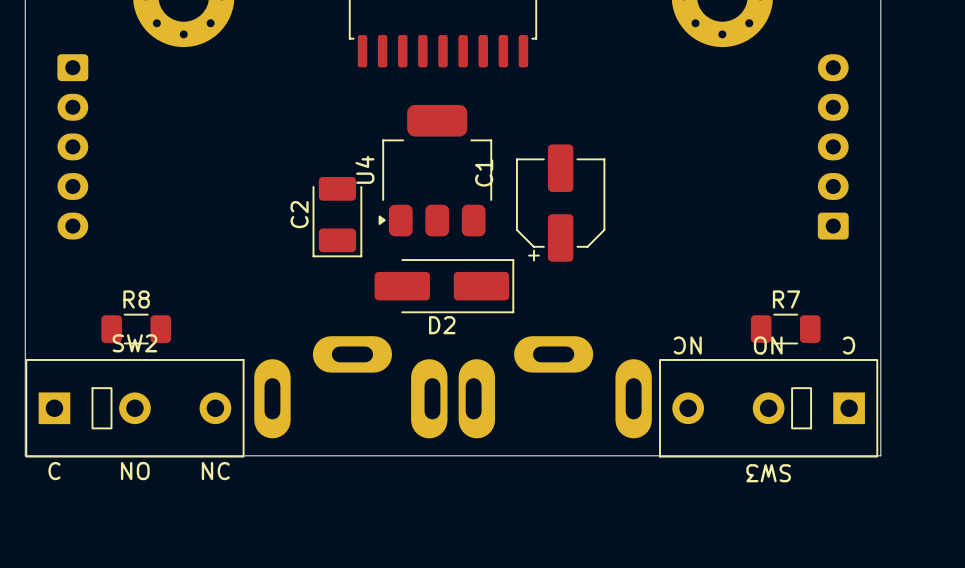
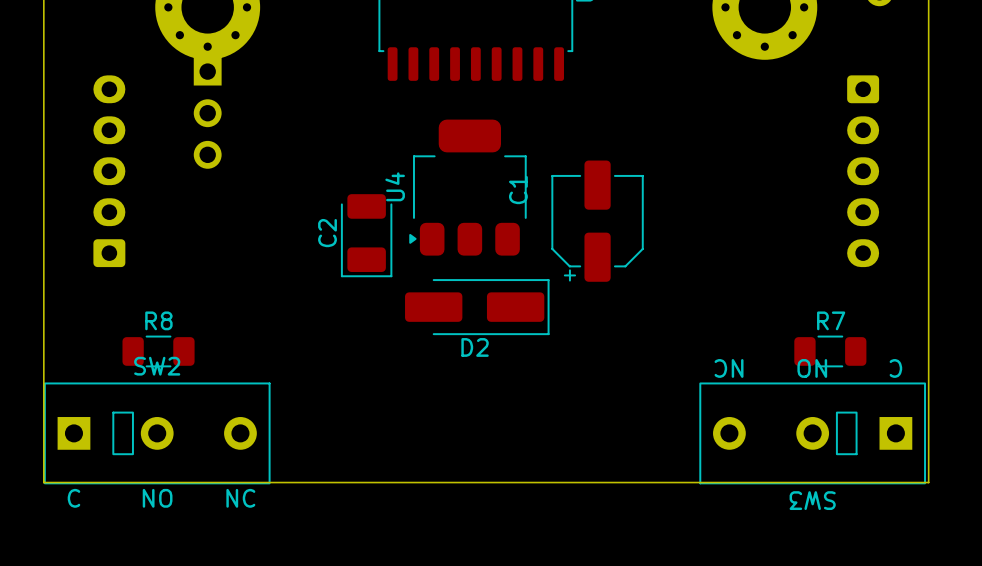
part: none -> (207, 113)
part rotation: 0° (72, 146) -> 180° (109, 171)
part rotation: 0° (833, 146) -> 180° (863, 171)
part: (453, 387) -> none

